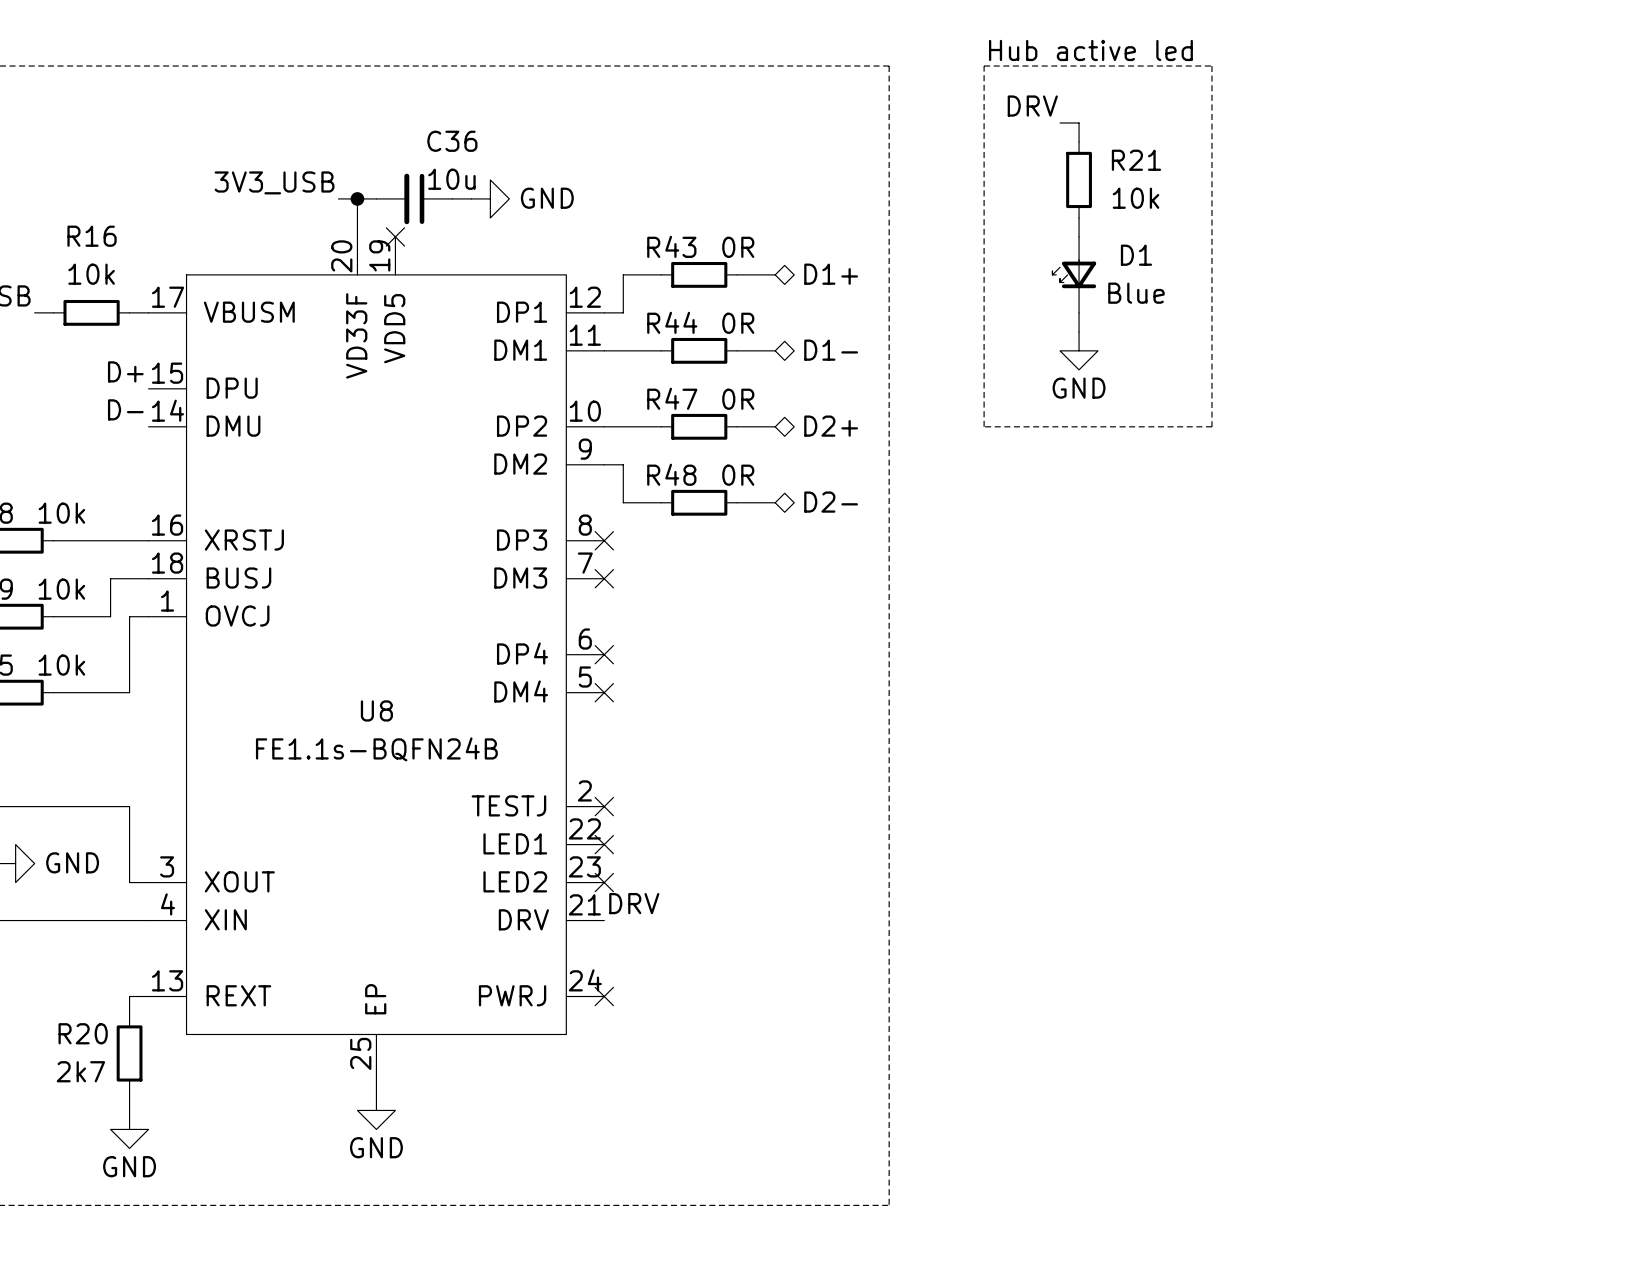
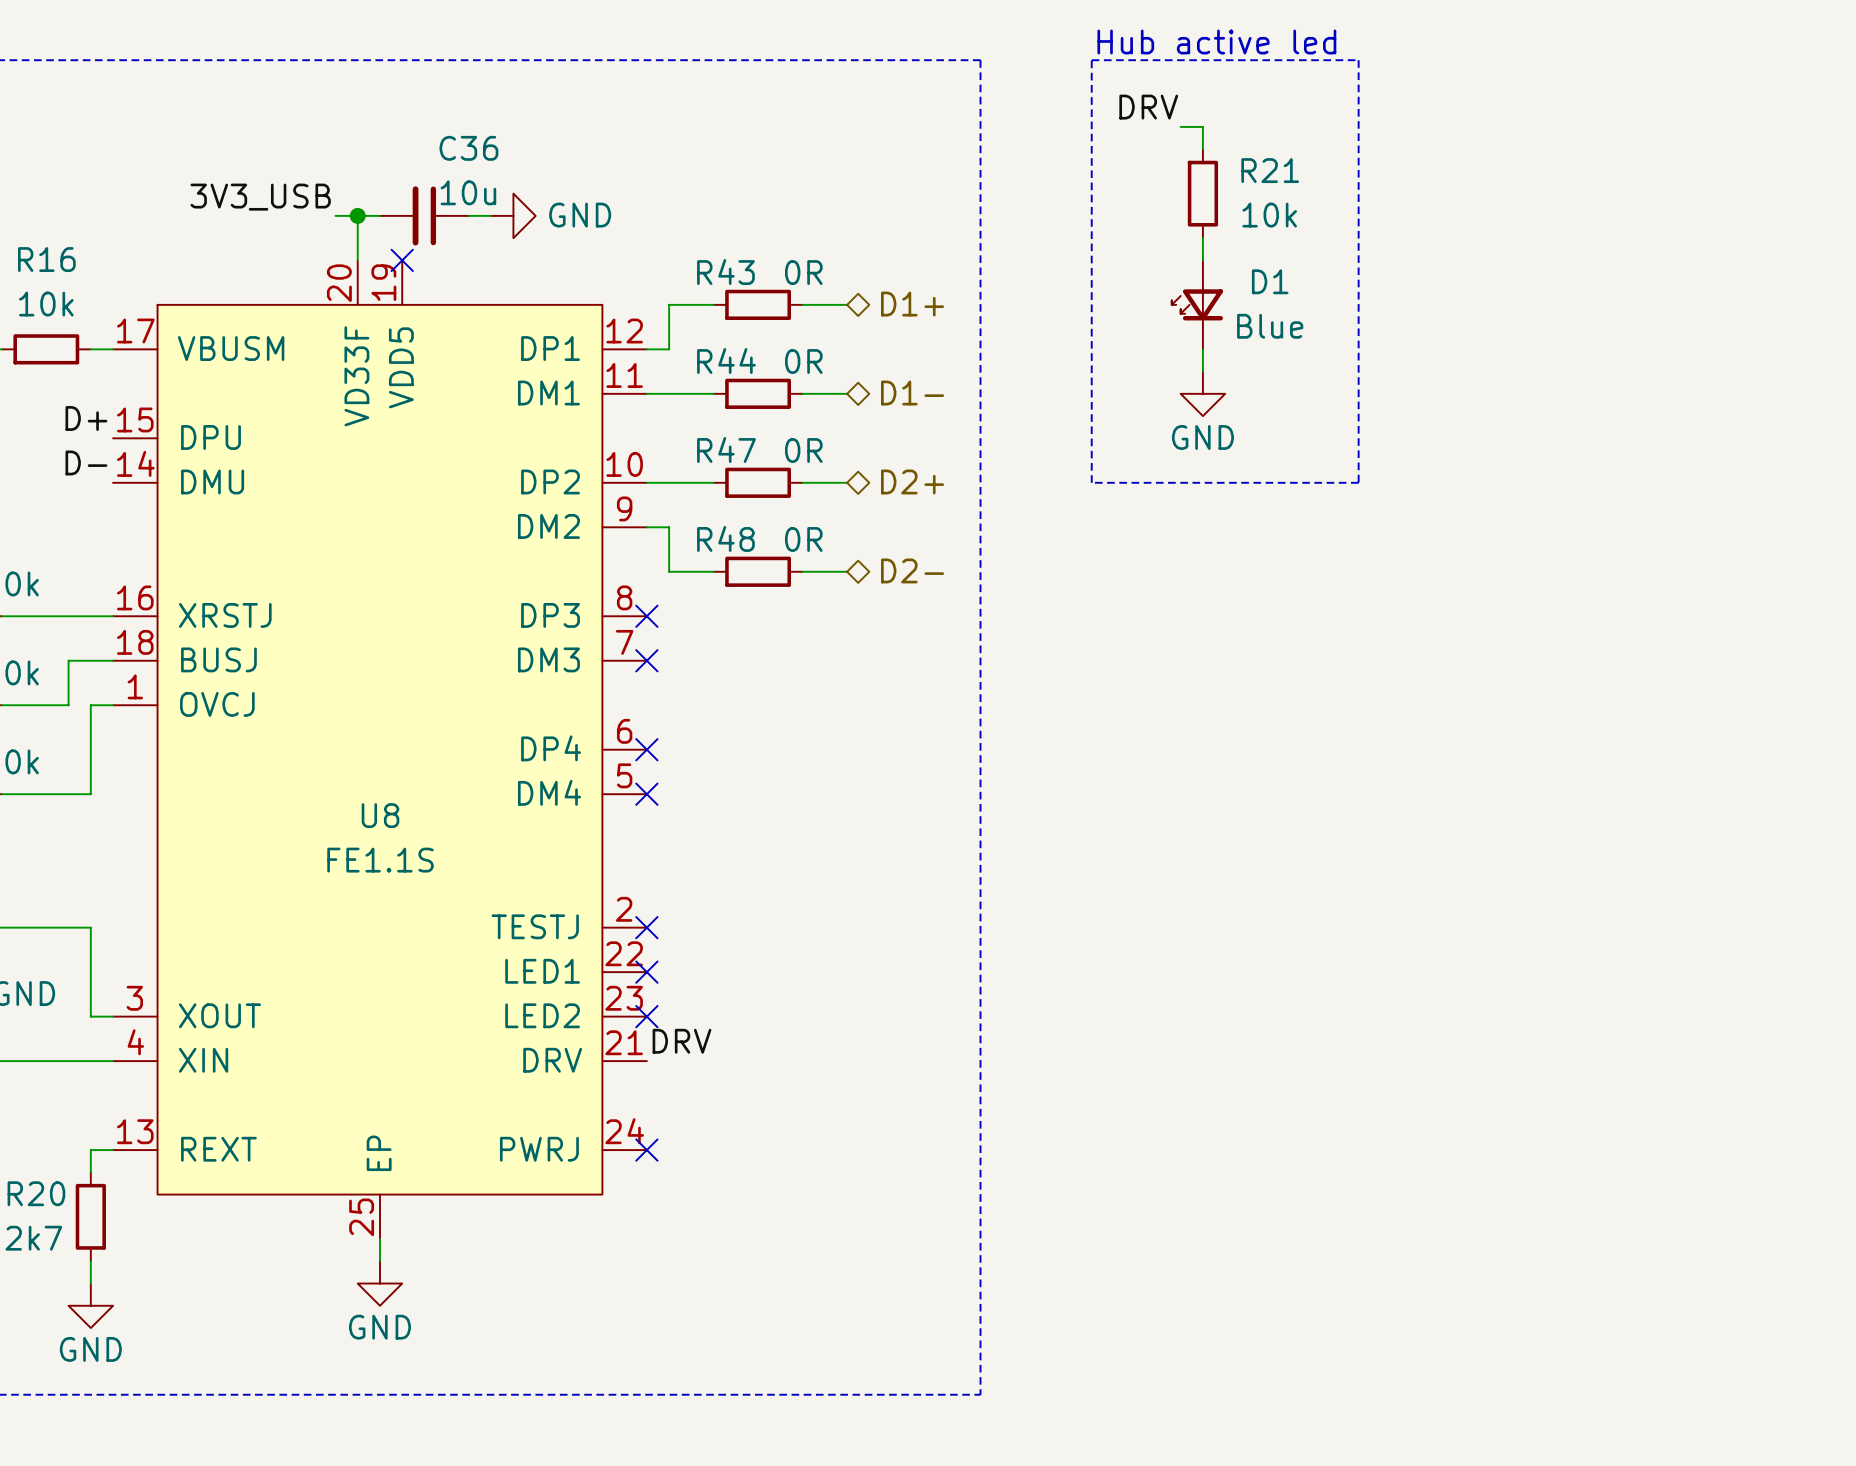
U8 value: FE1.1s-BQFN24B (376, 749) -> FE1.1S (380, 860)

